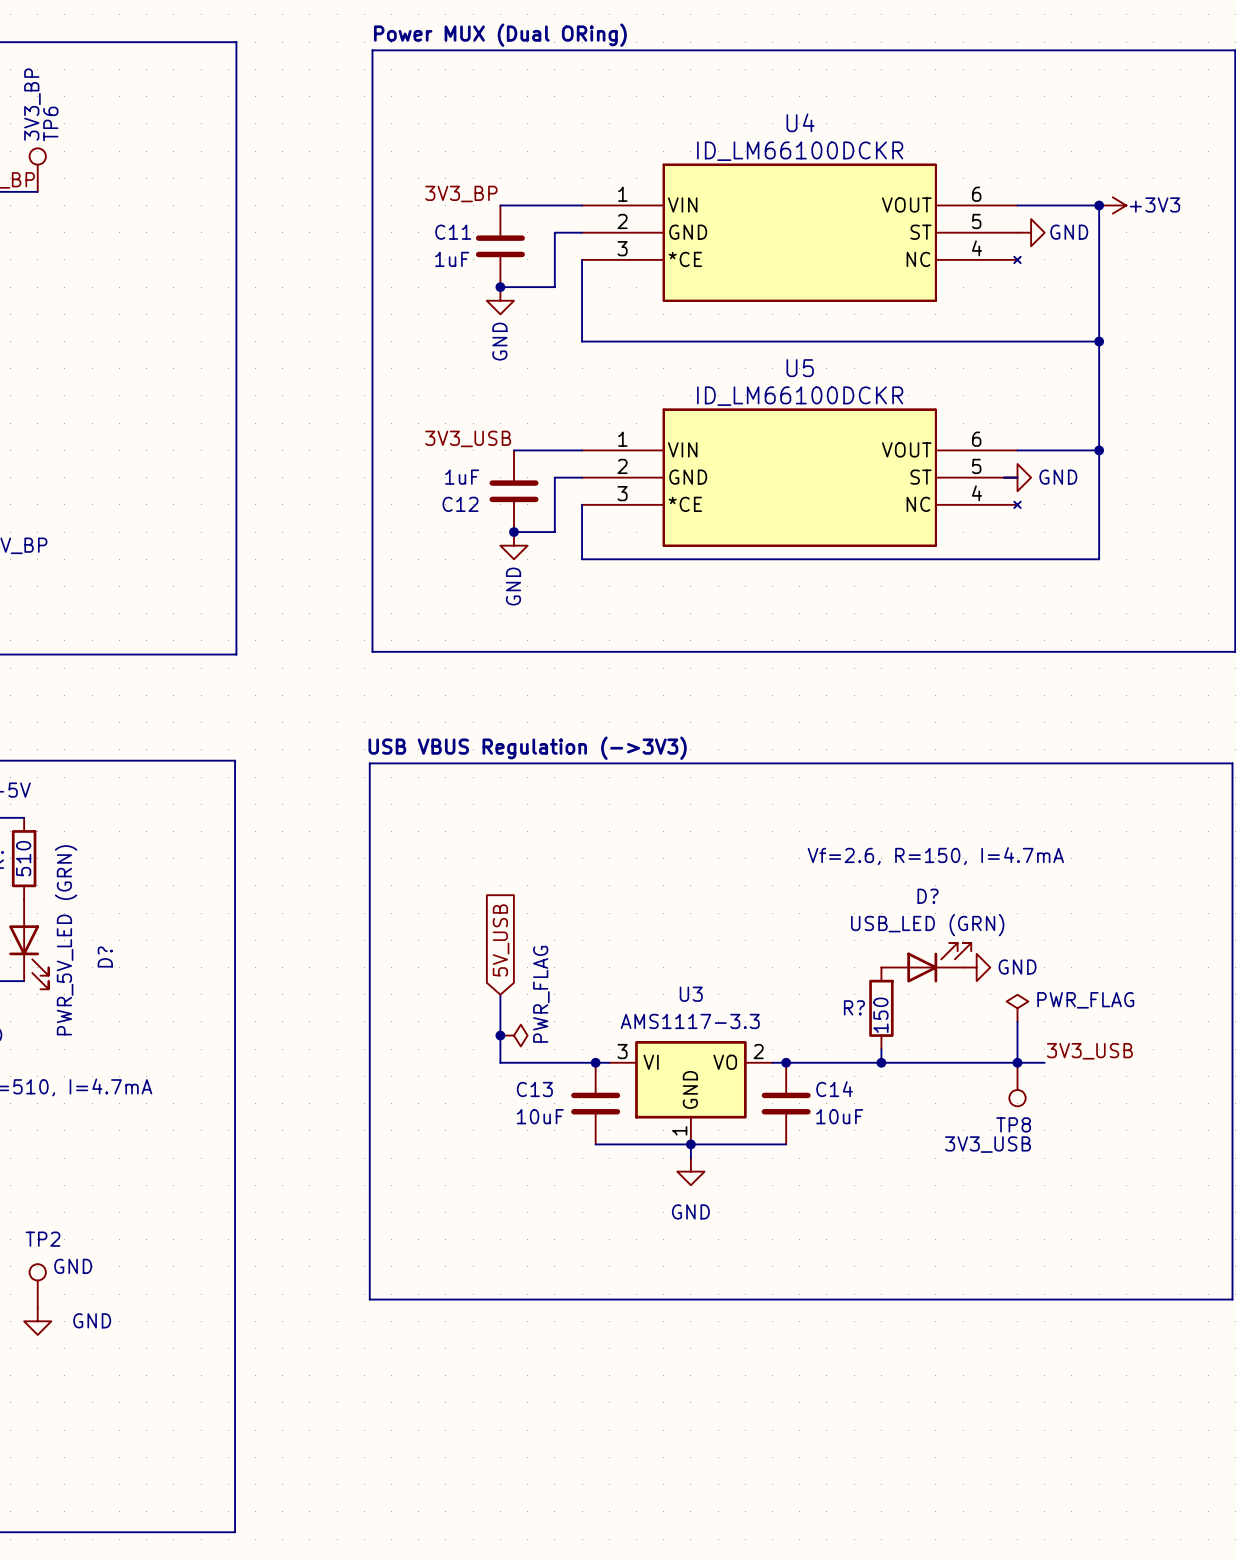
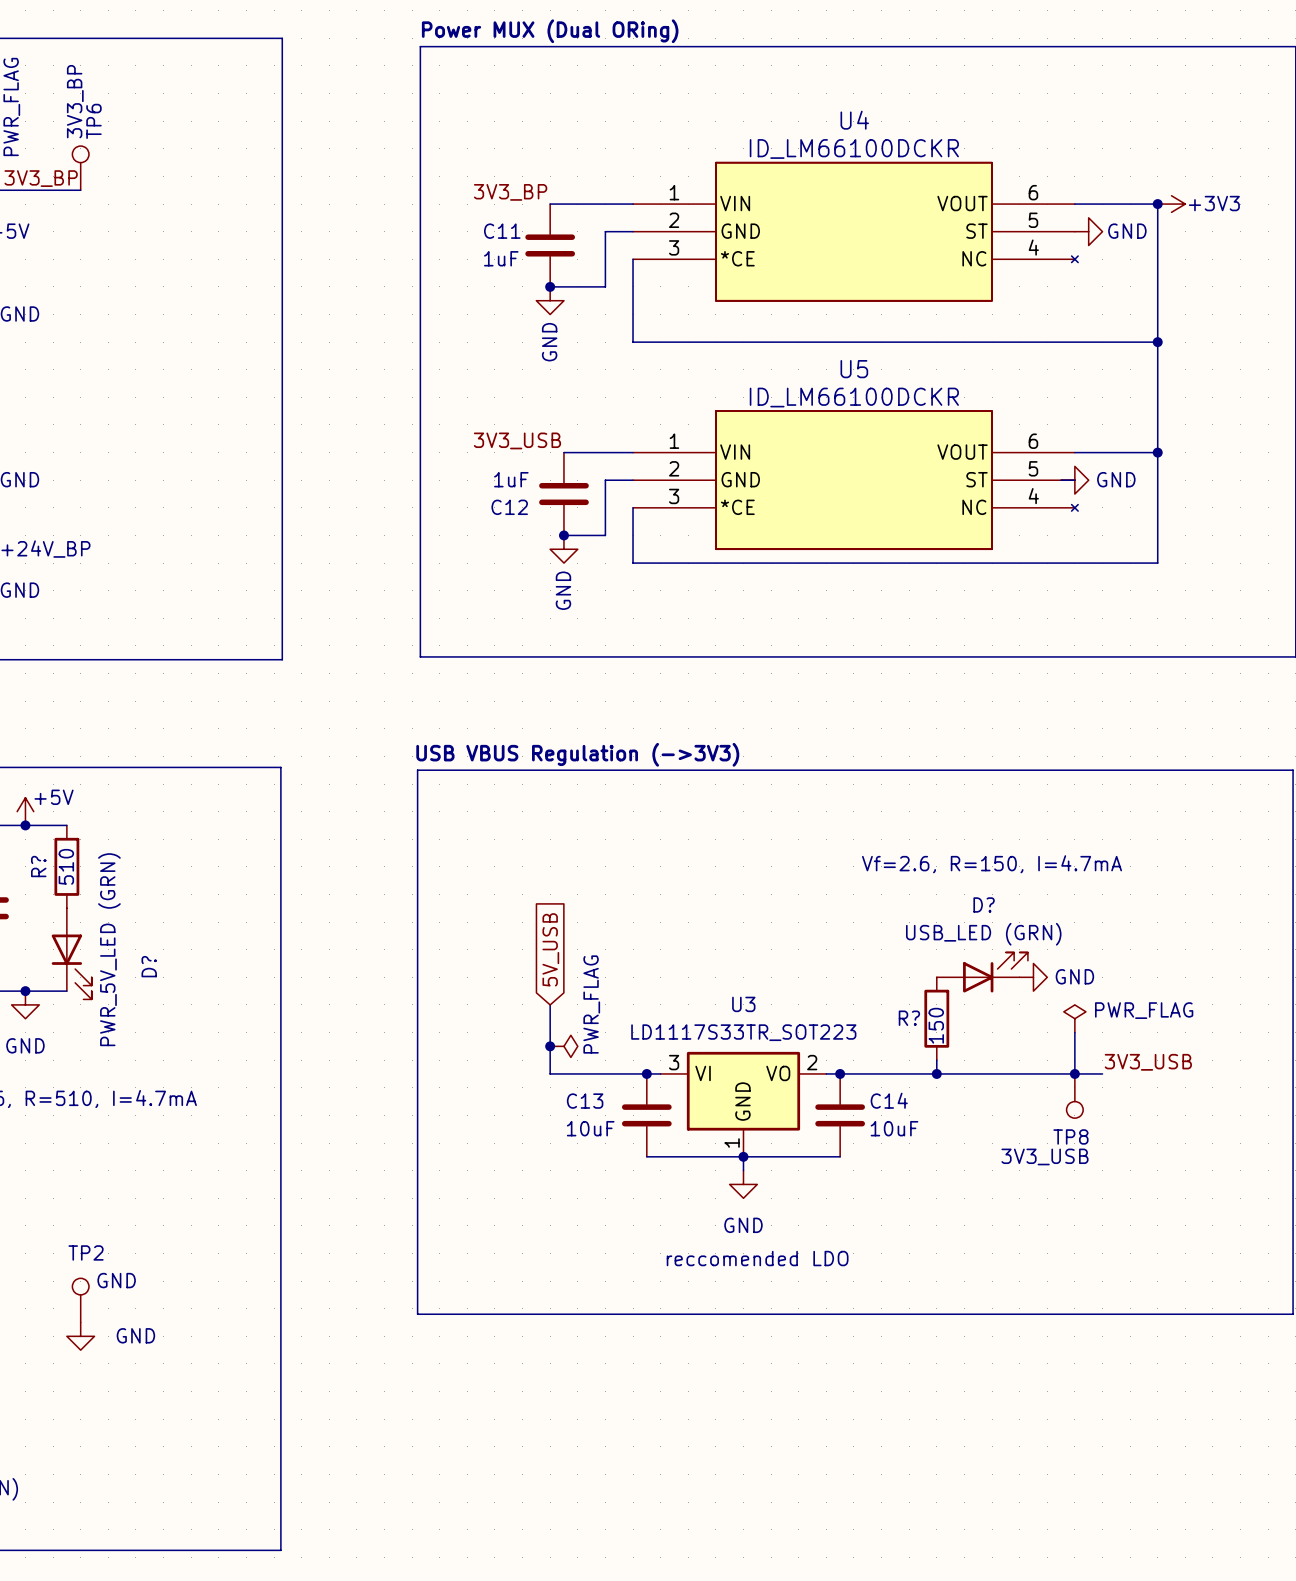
U3 value: AMS1117-3.3 (690, 1021) -> LD1117S33TR_SOT223 (743, 1032)
text: none -> reccomended LDO (757, 1258)

